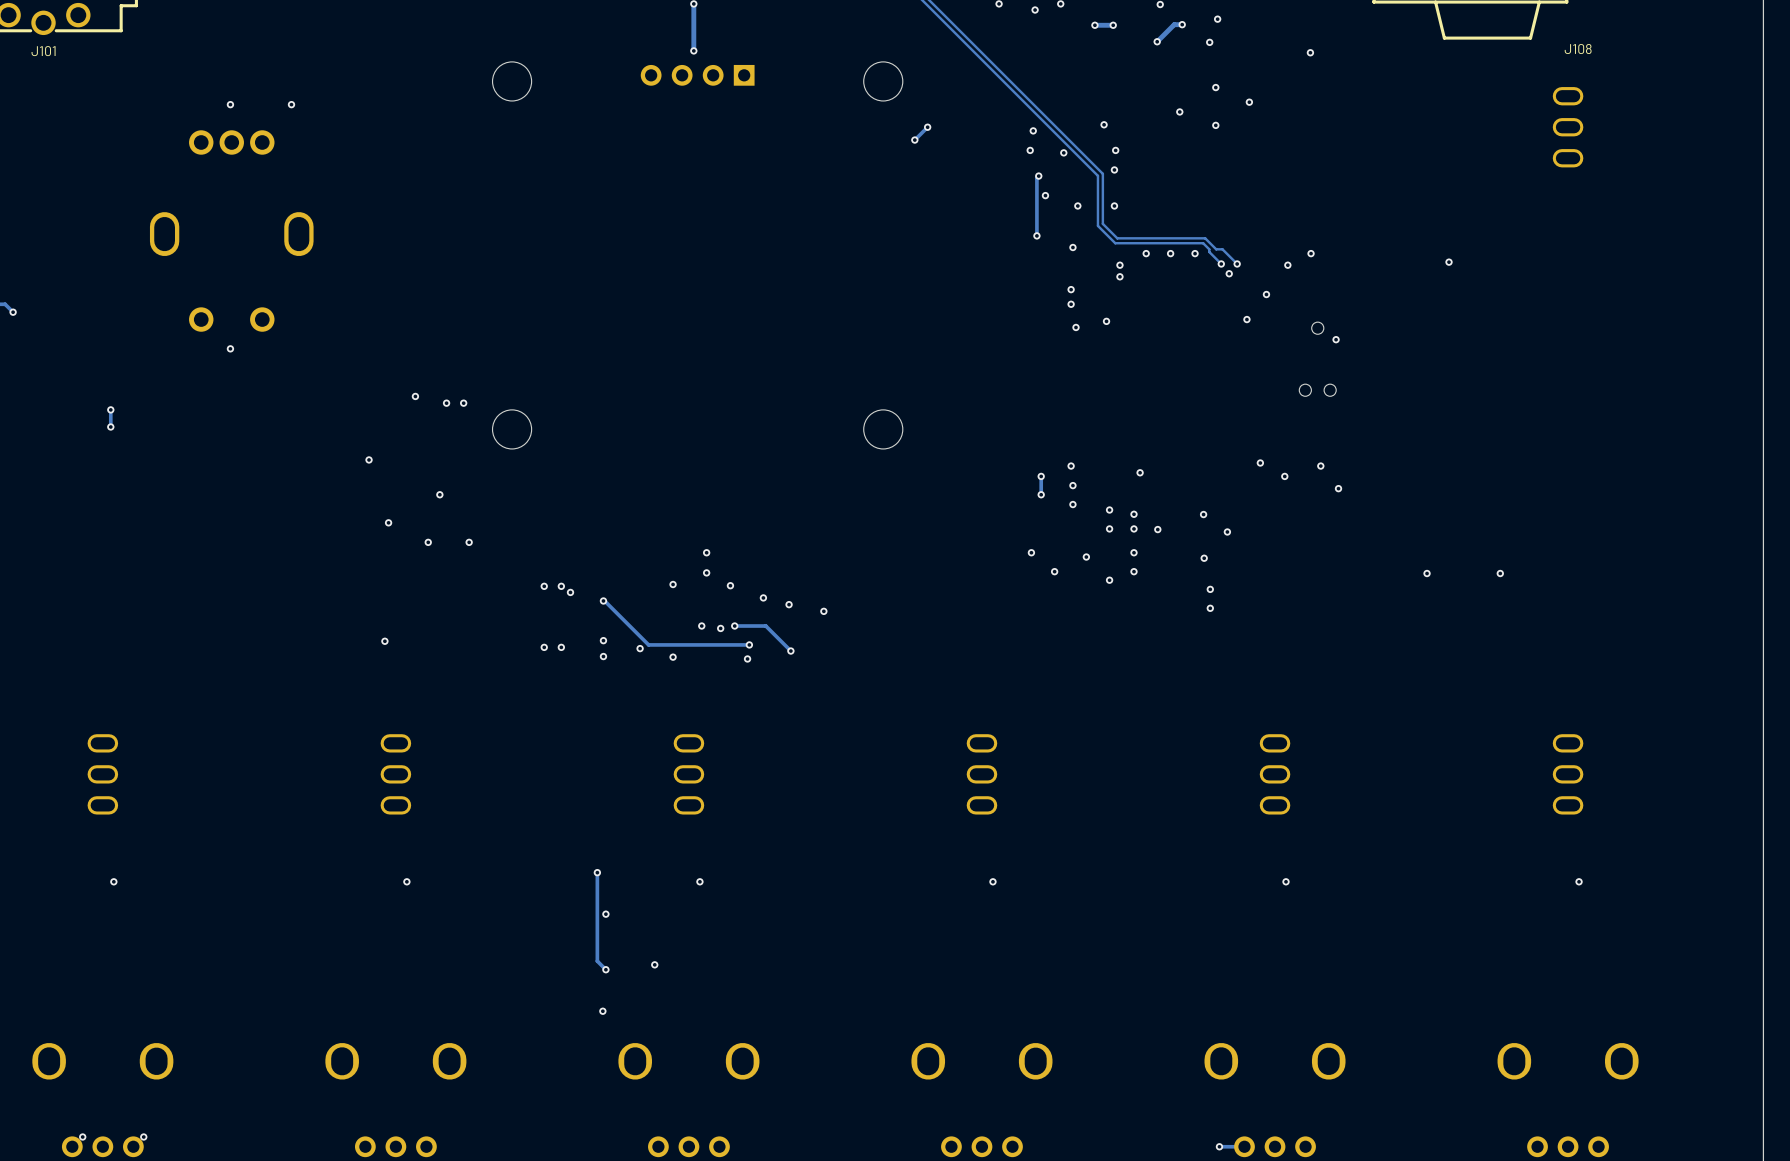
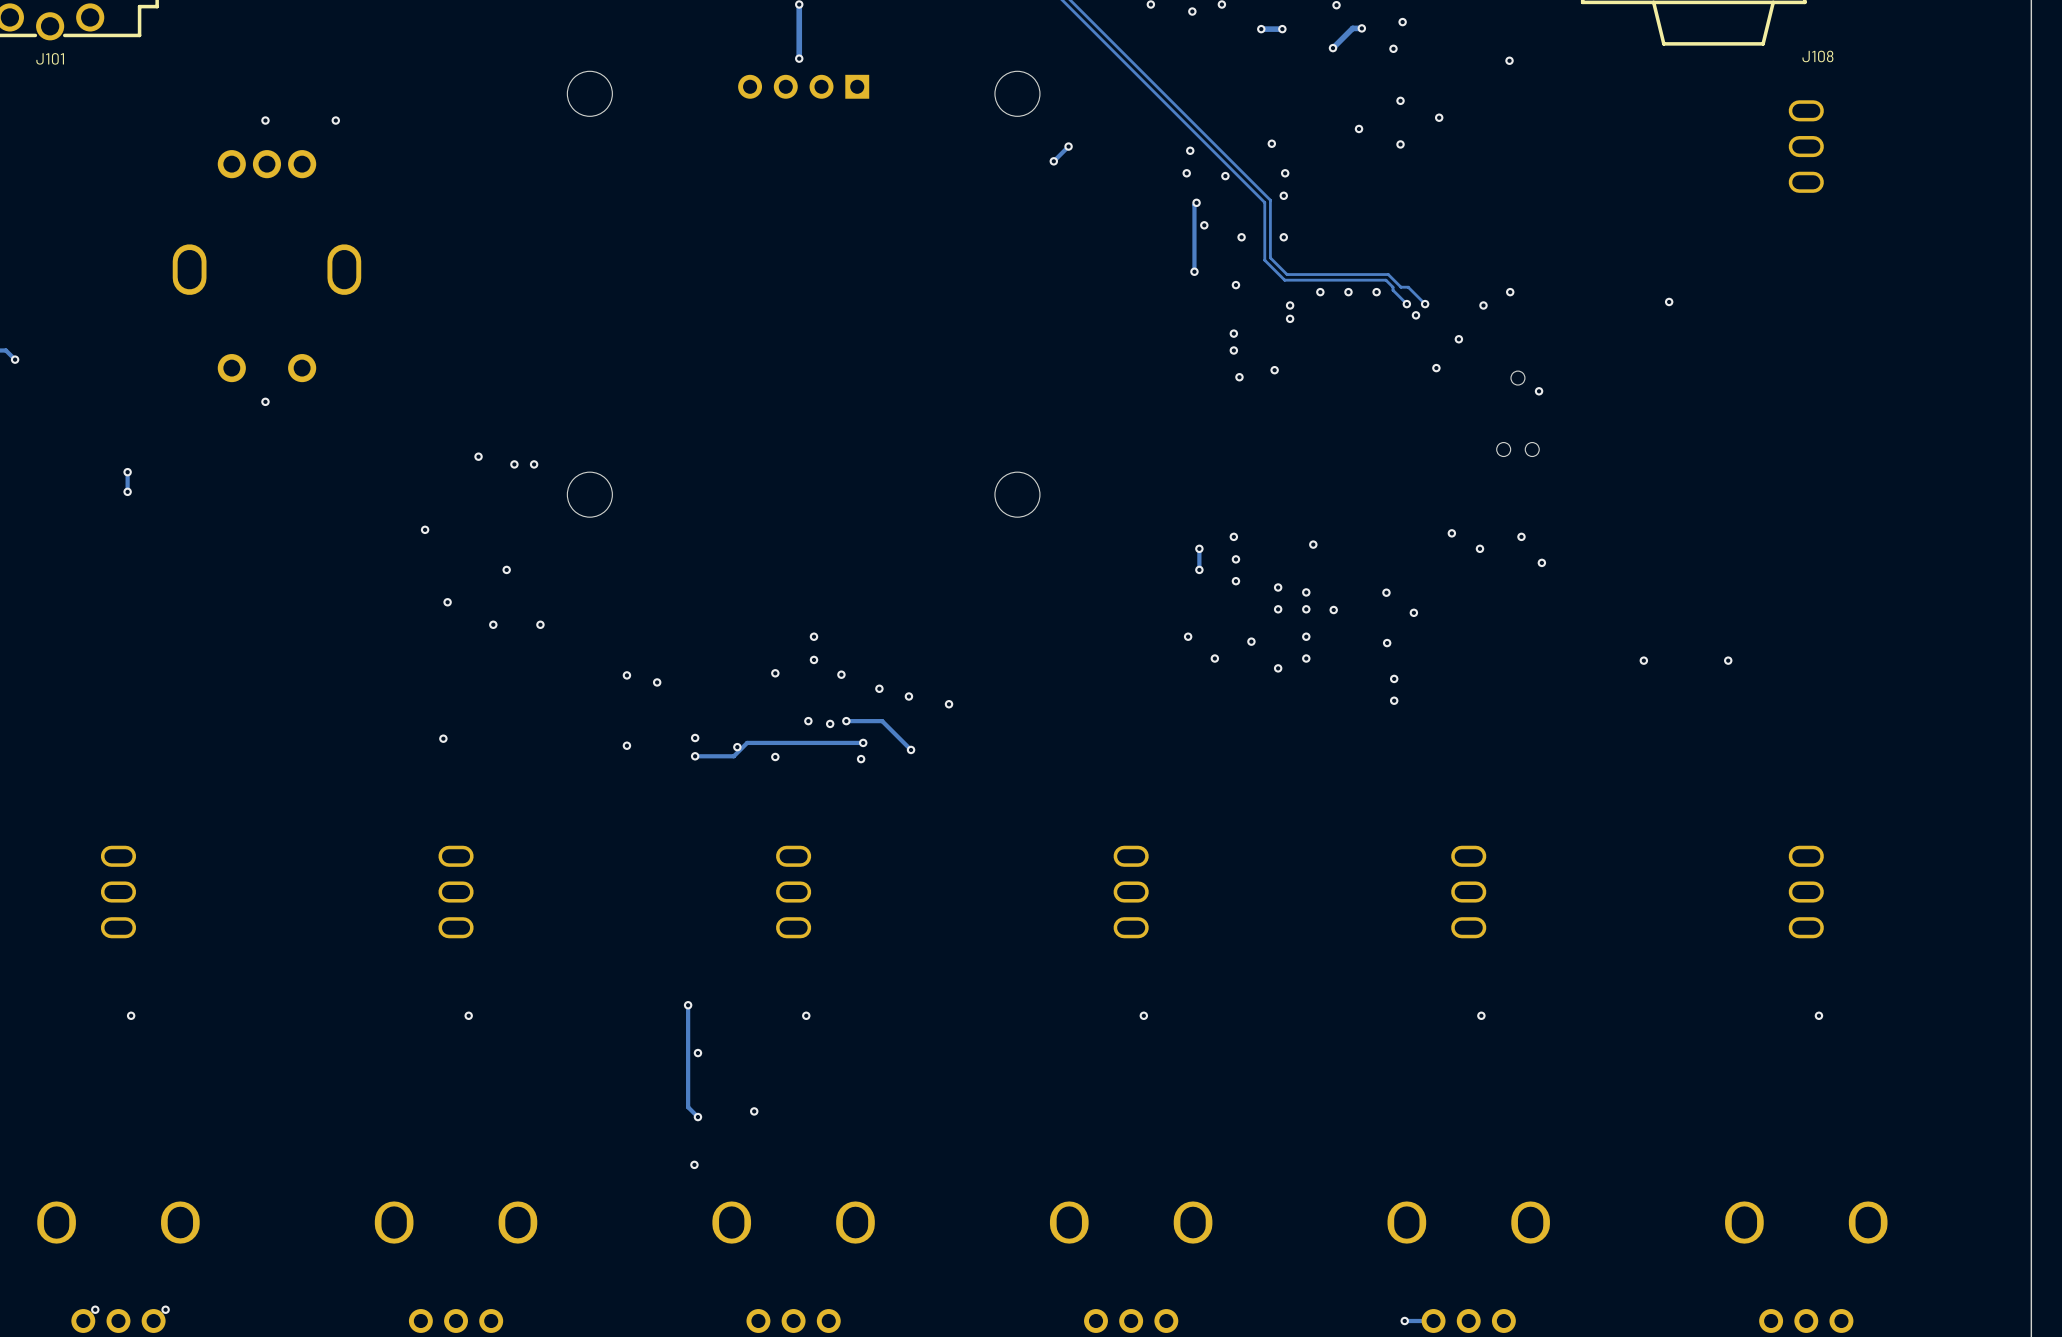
via: (561, 586) -> none
track: (603, 600) (648, 644) -> (695, 756) (733, 756) (747, 742)
via: (603, 600) -> none
via: (561, 647) -> none

